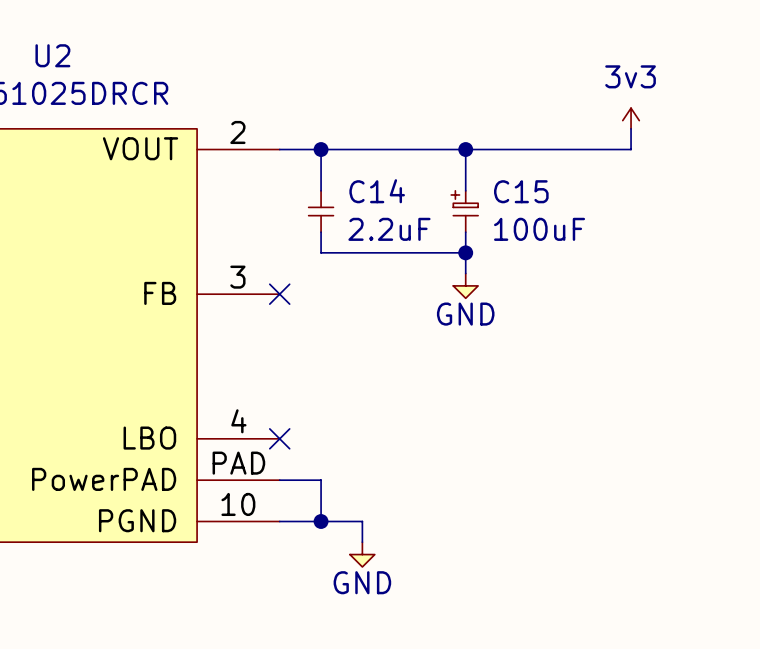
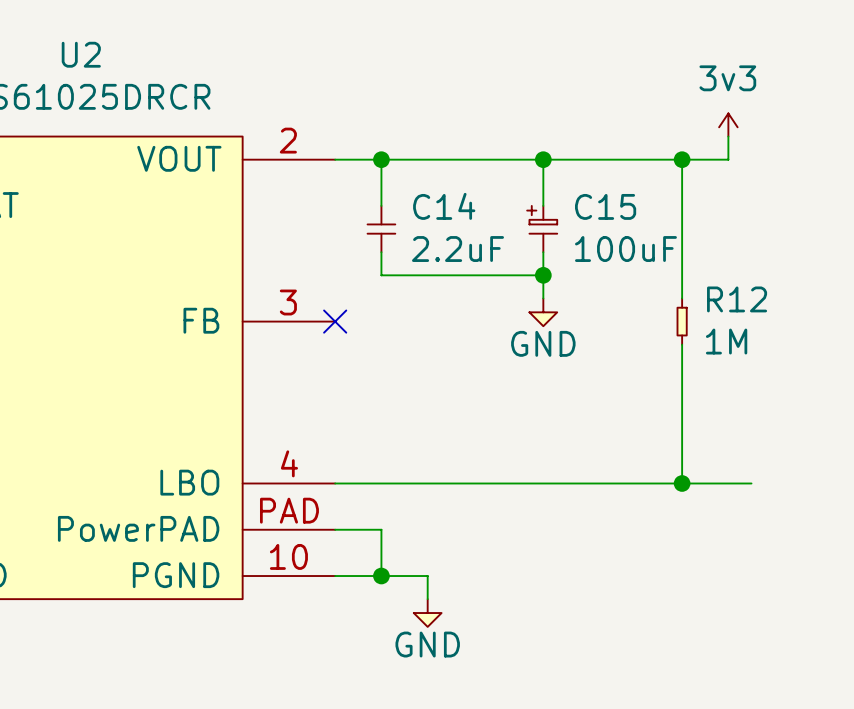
wire: none -> (682, 159) (682, 298)
junction: none -> (682, 159)
R12: none -> 1M (682, 321)
wire: none -> (682, 344) (682, 483)
wire: none -> (335, 483) (751, 483)
no-connect mark: (279, 438) -> none
junction: none -> (682, 483)

